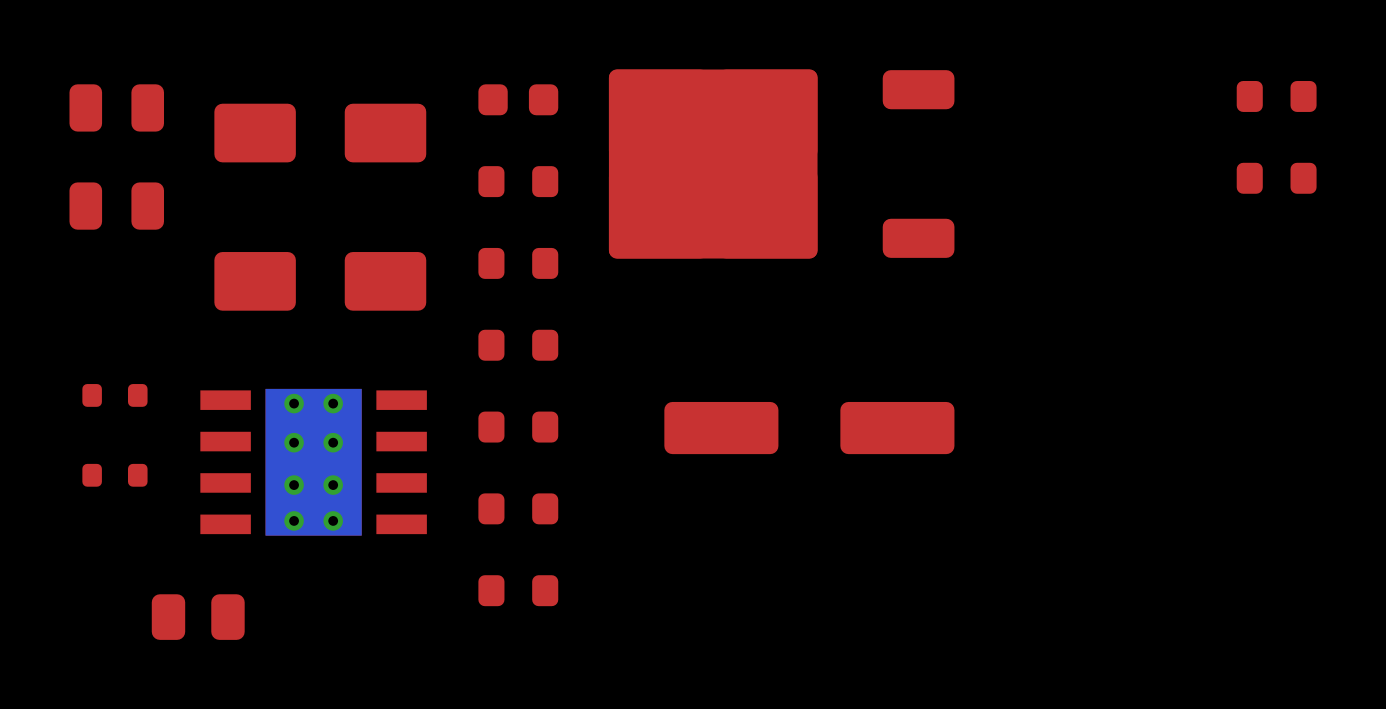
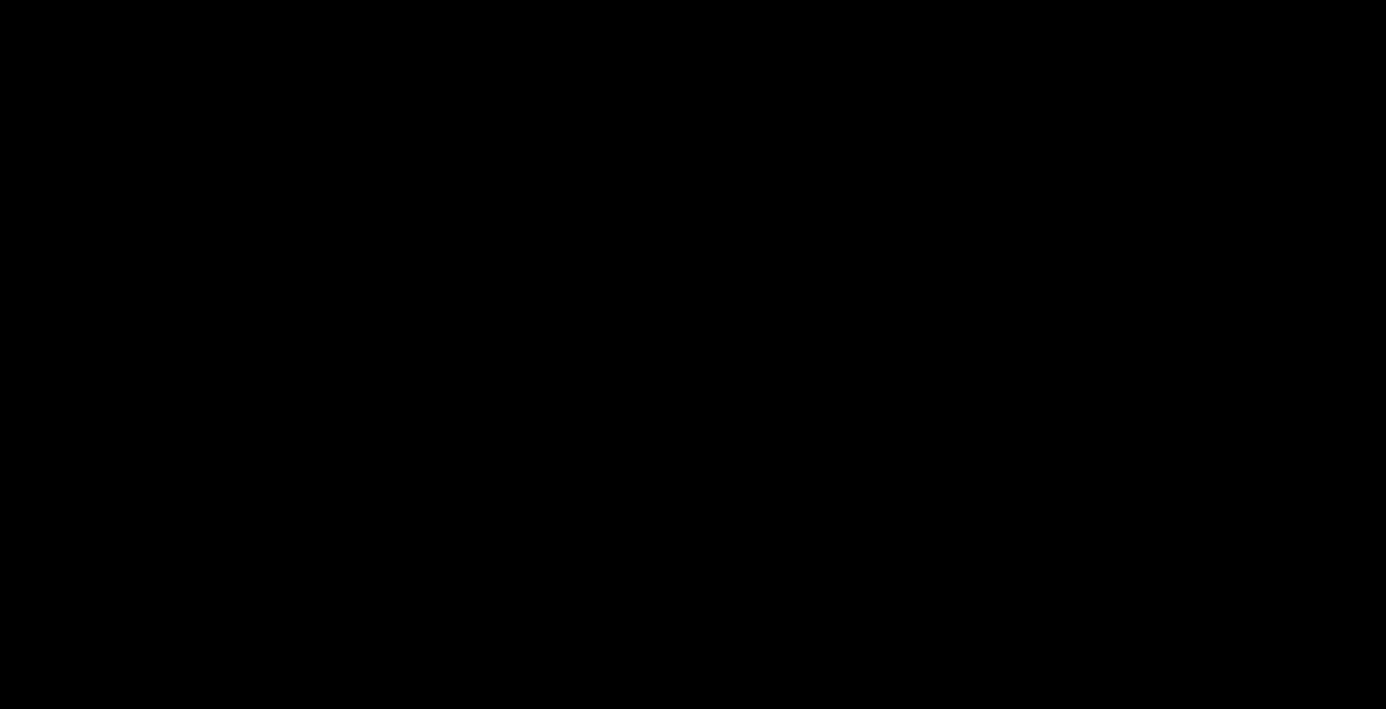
part: (1276, 96) -> none
part: (518, 99) -> none
part: (116, 107) -> none
part: (320, 133) -> none
part: (781, 164) -> none
part: (1276, 178) -> none
part: (518, 181) -> none
part: (116, 206) -> none
part: (518, 263) -> none
part: (320, 281) -> none
part: (518, 345) -> none
part: (114, 395) -> none
part: (518, 427) -> none
part: (809, 428) -> none
part: (313, 462) -> none
part: (114, 475) -> none
part: (518, 508) -> none
part: (518, 590) -> none
part: (198, 617) -> none

